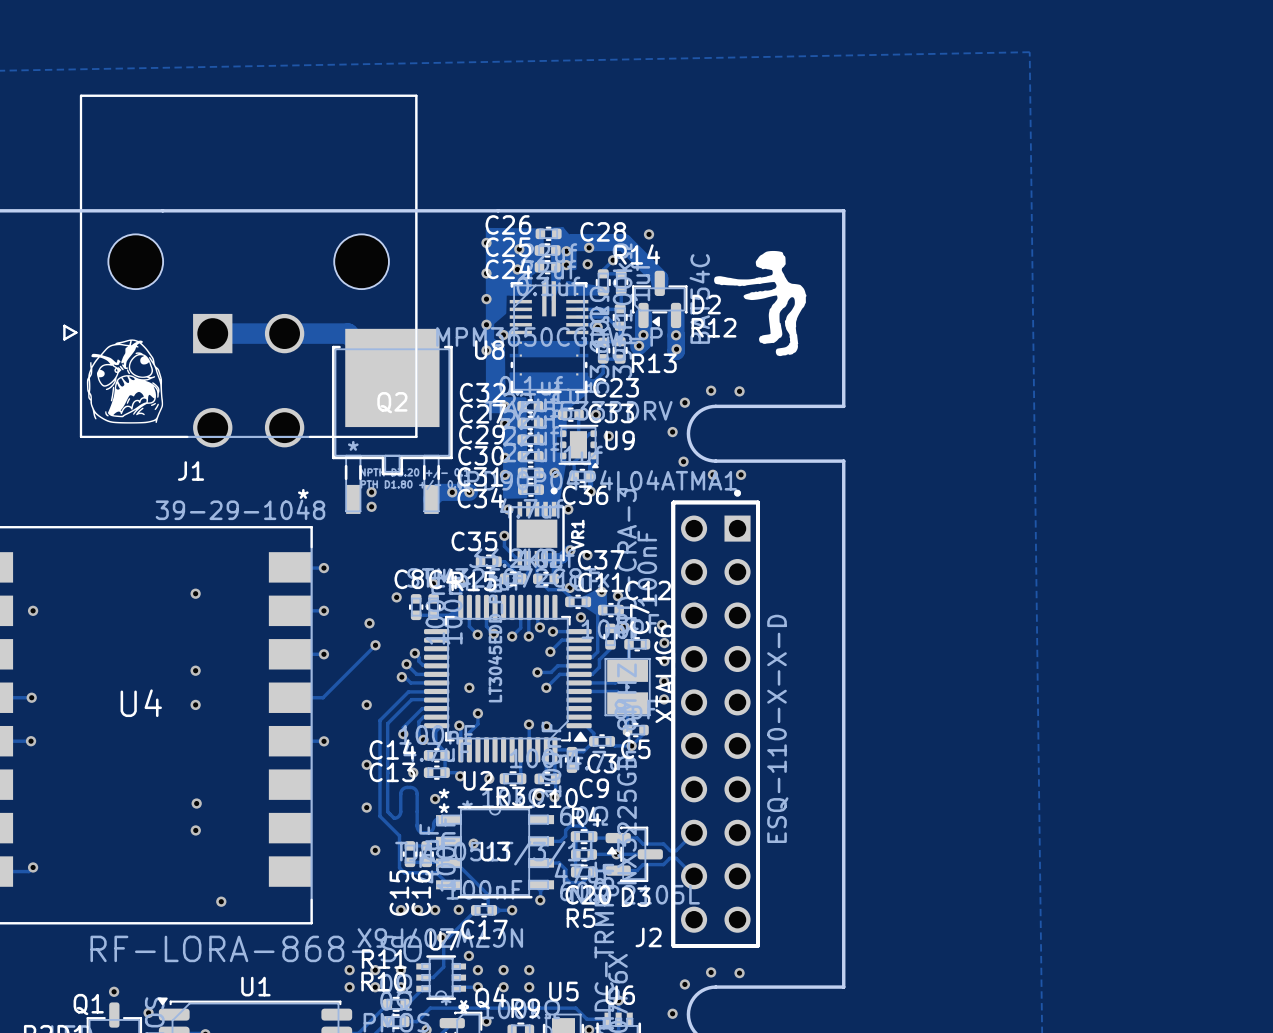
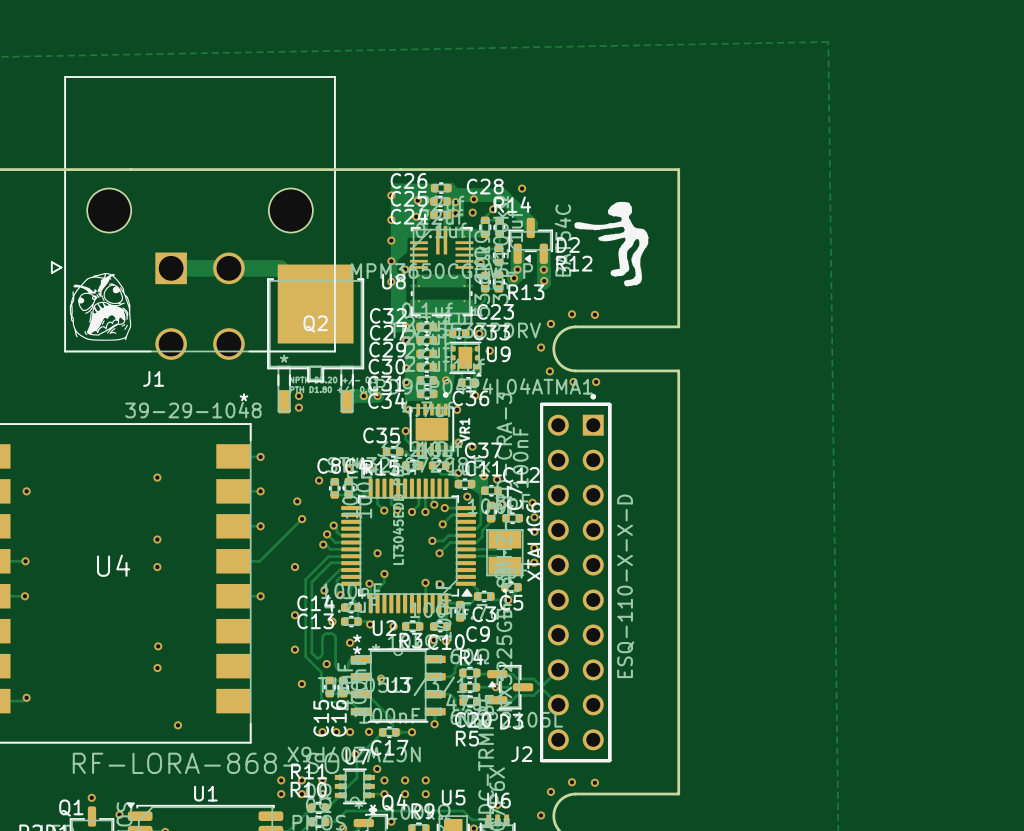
via: none -> (326, 664)

